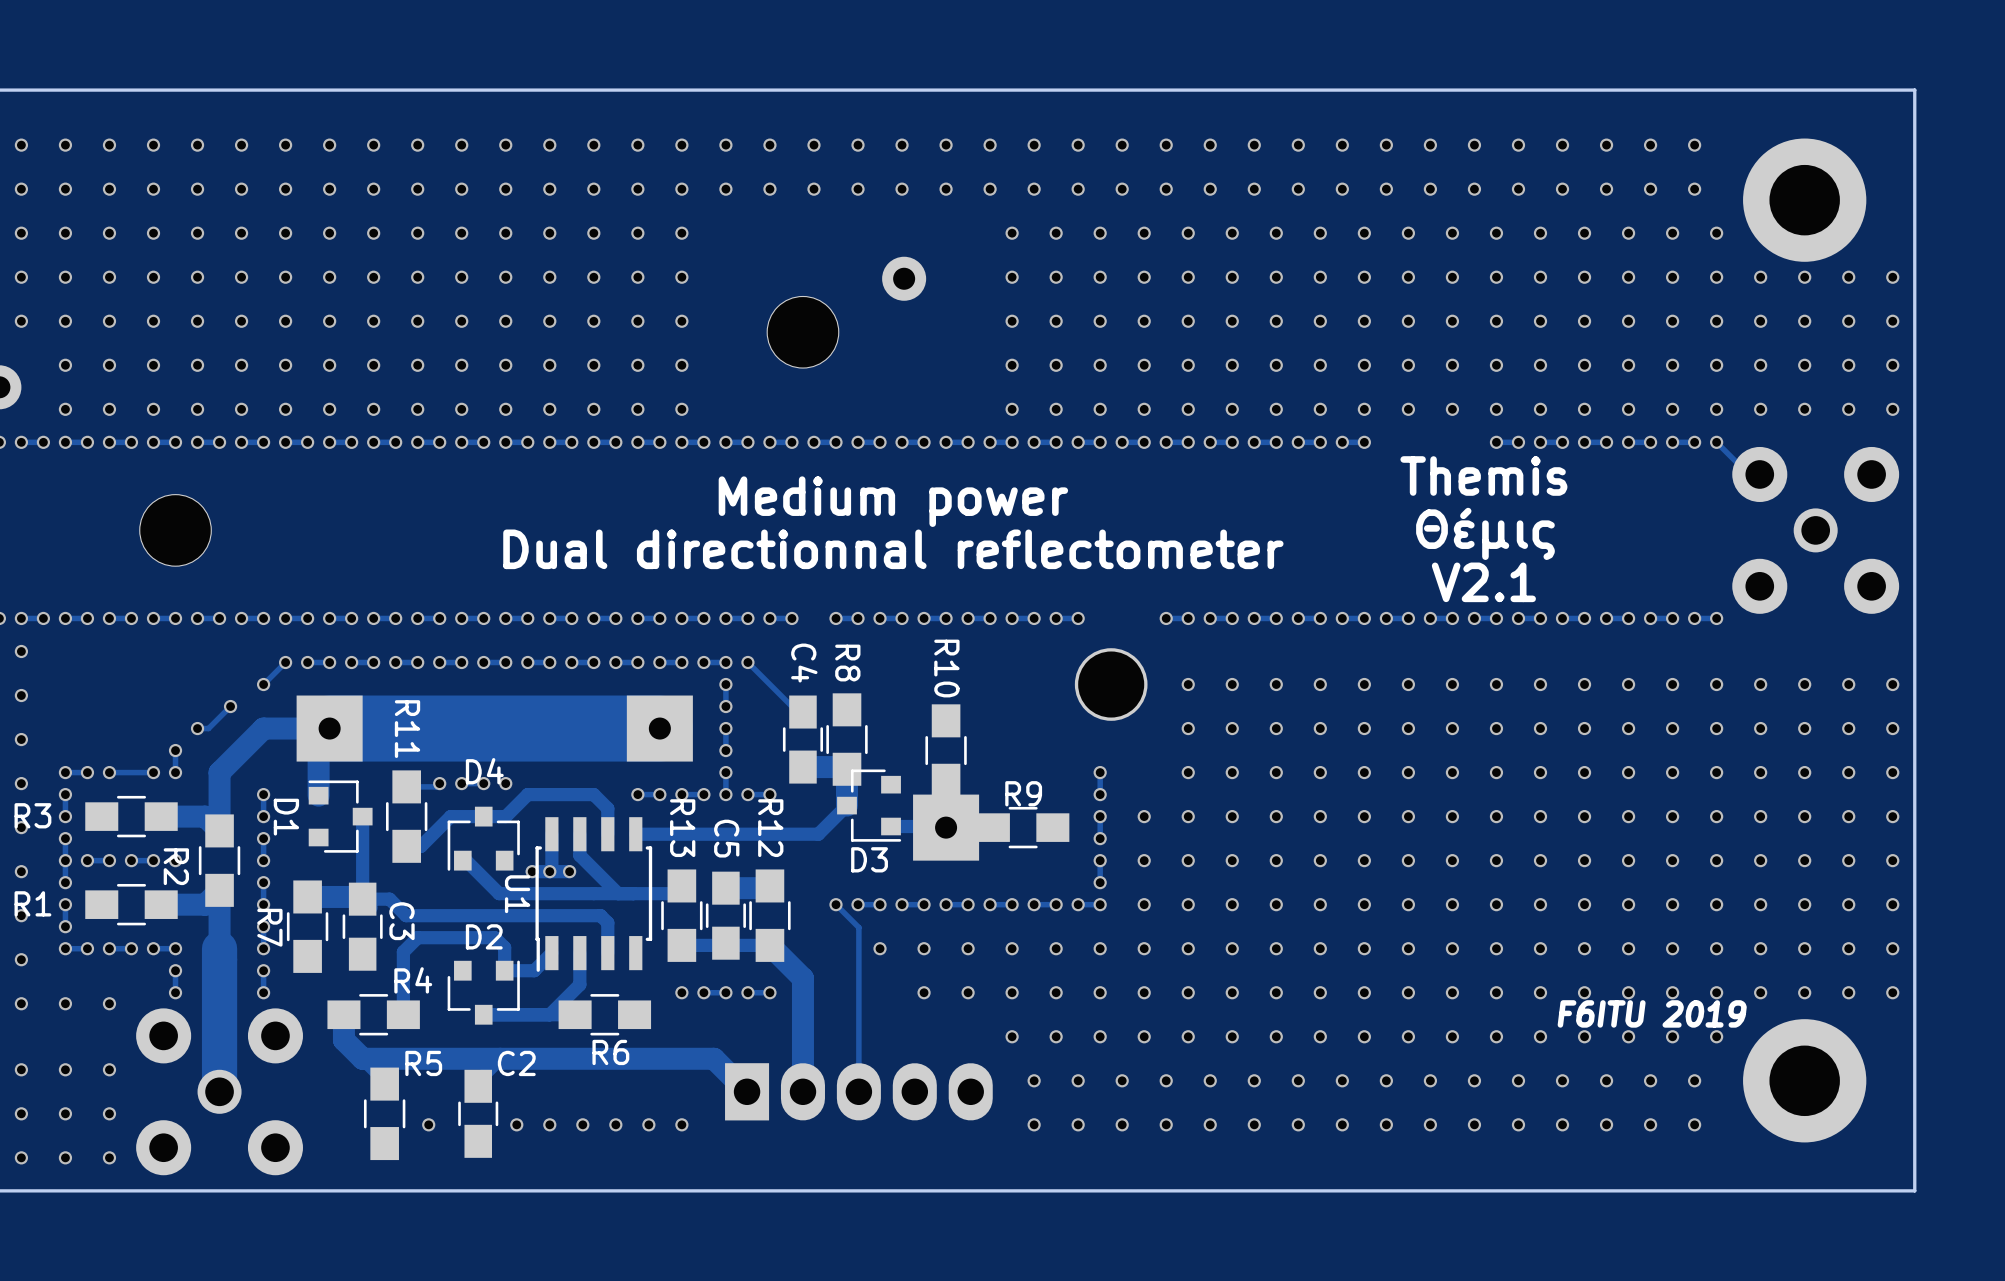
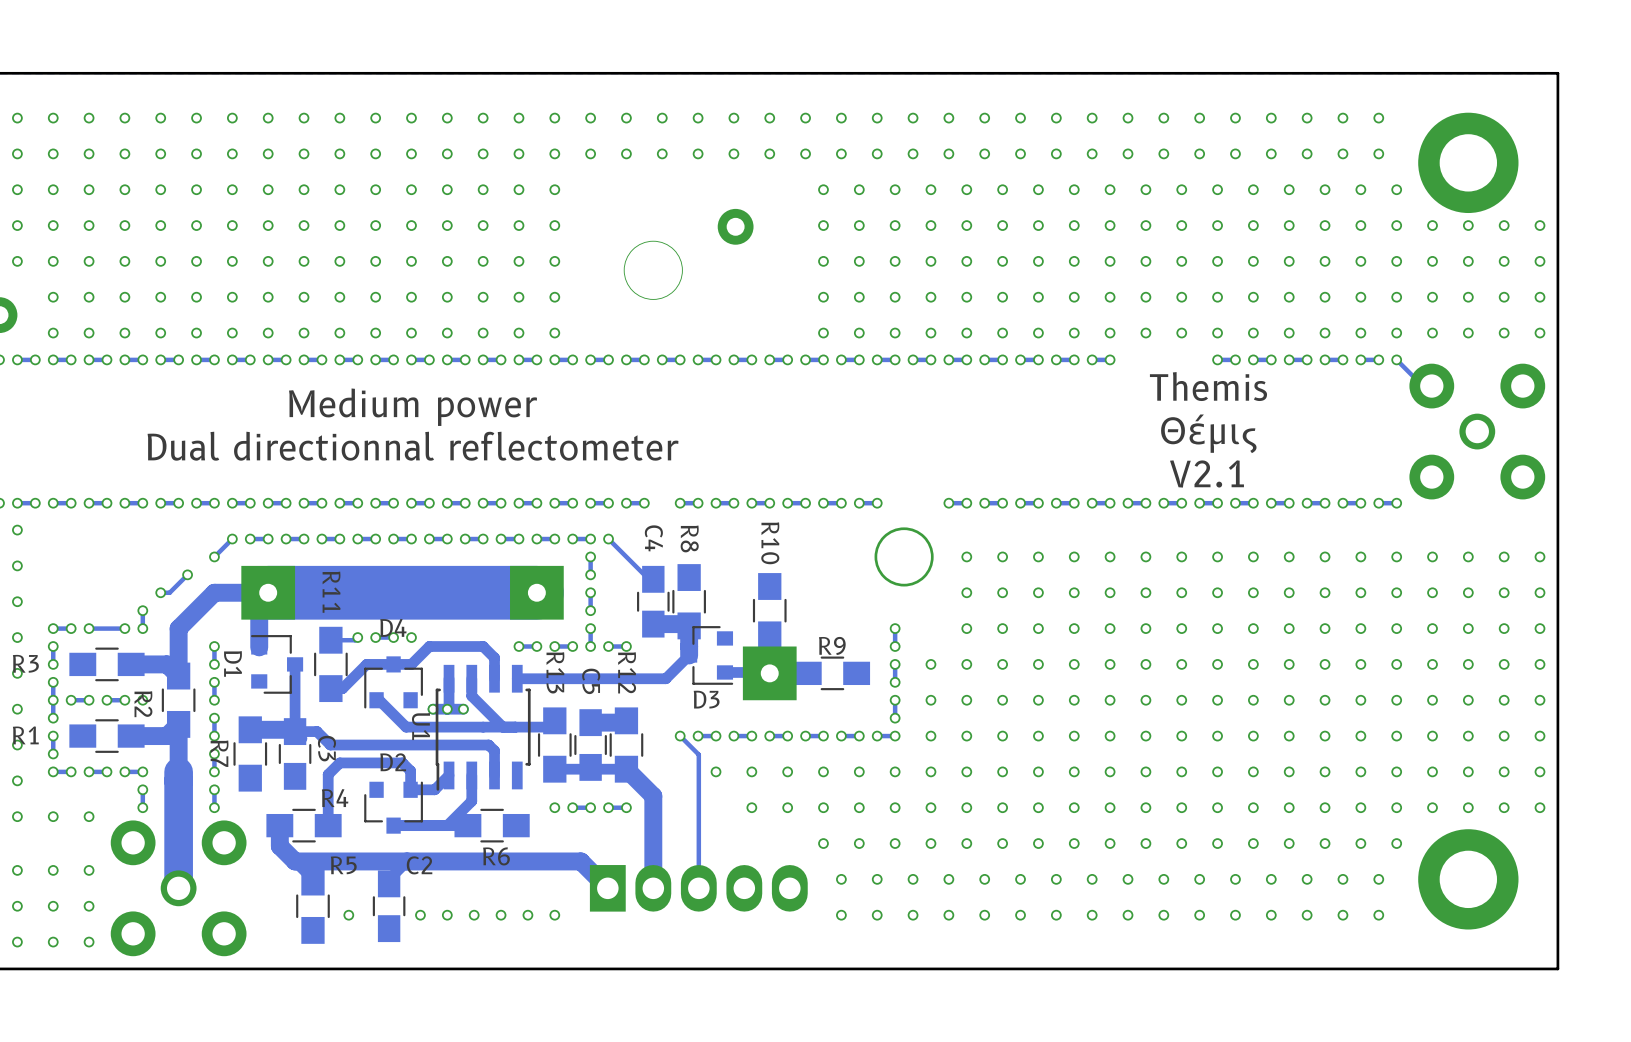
text position: Medium power (893, 501) -> Medium power (413, 407)
part: (175, 530) -> none
text position: Dual directionnal reflectometer (893, 549) -> Dual directionnal reflectometer (413, 446)
text: F6ITU 2019 (1652, 1013) -> none

